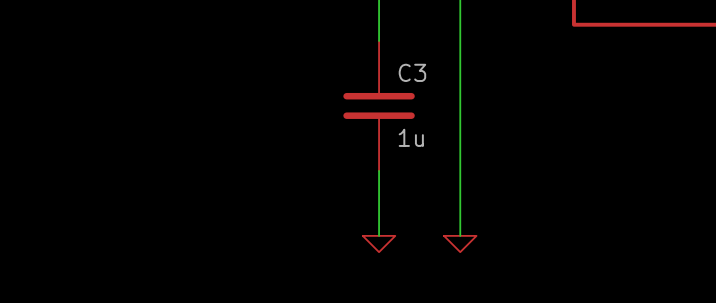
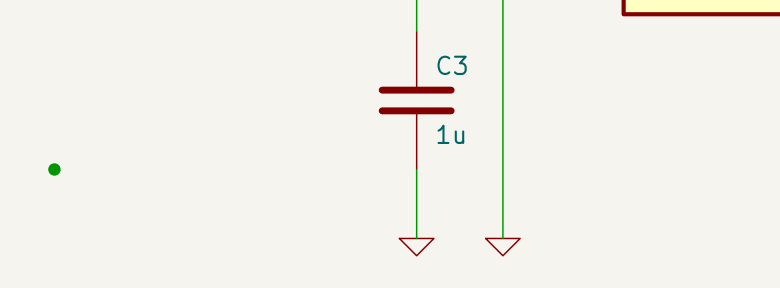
junction: none -> (54, 169)

